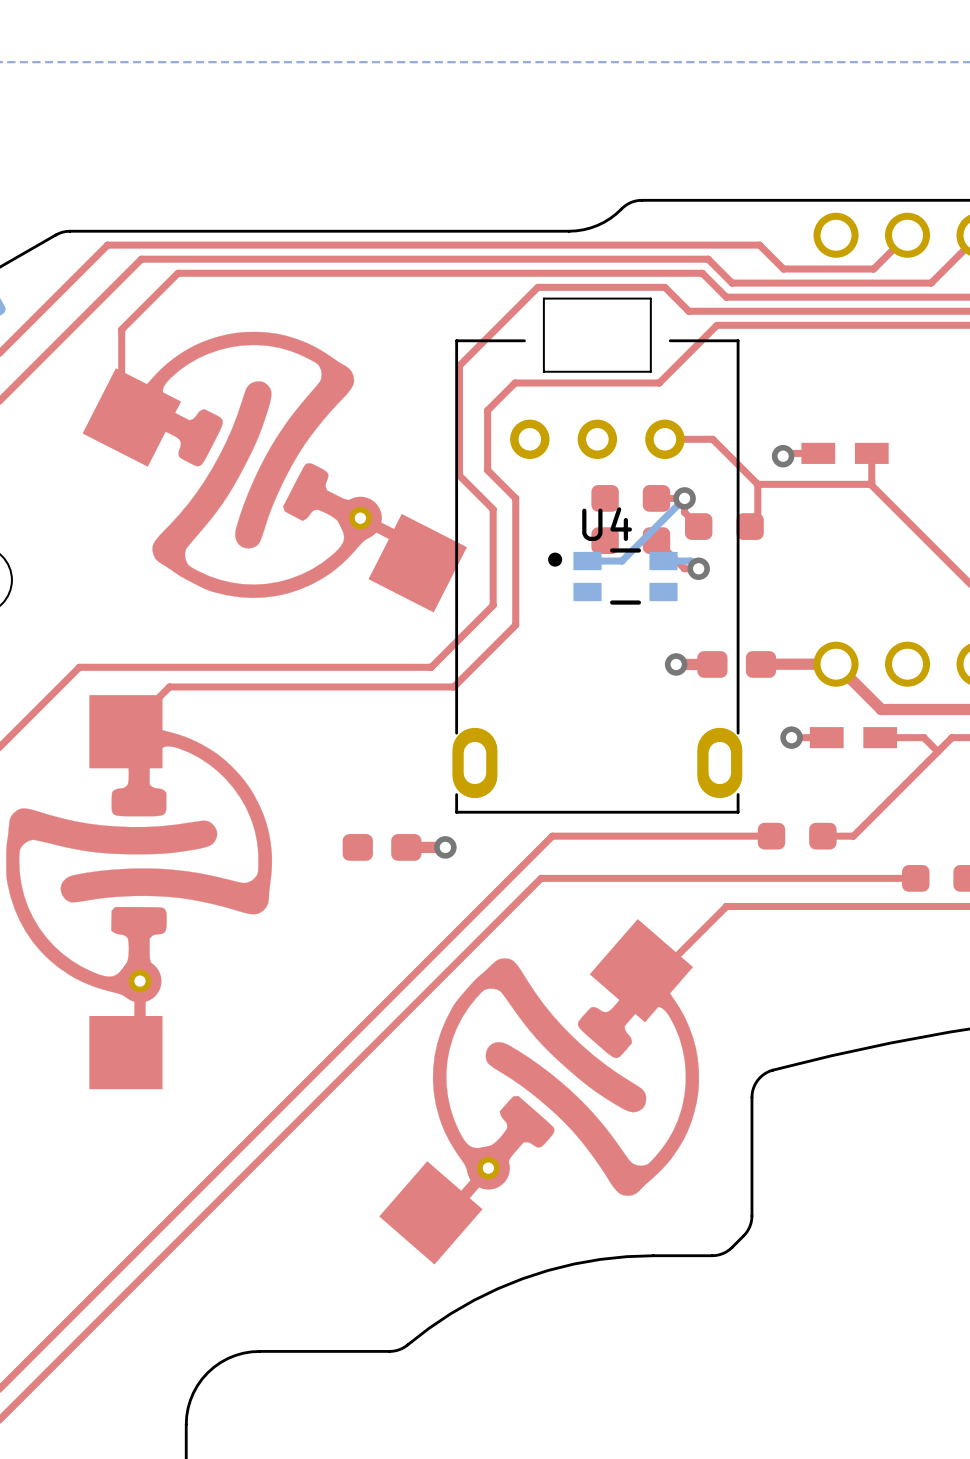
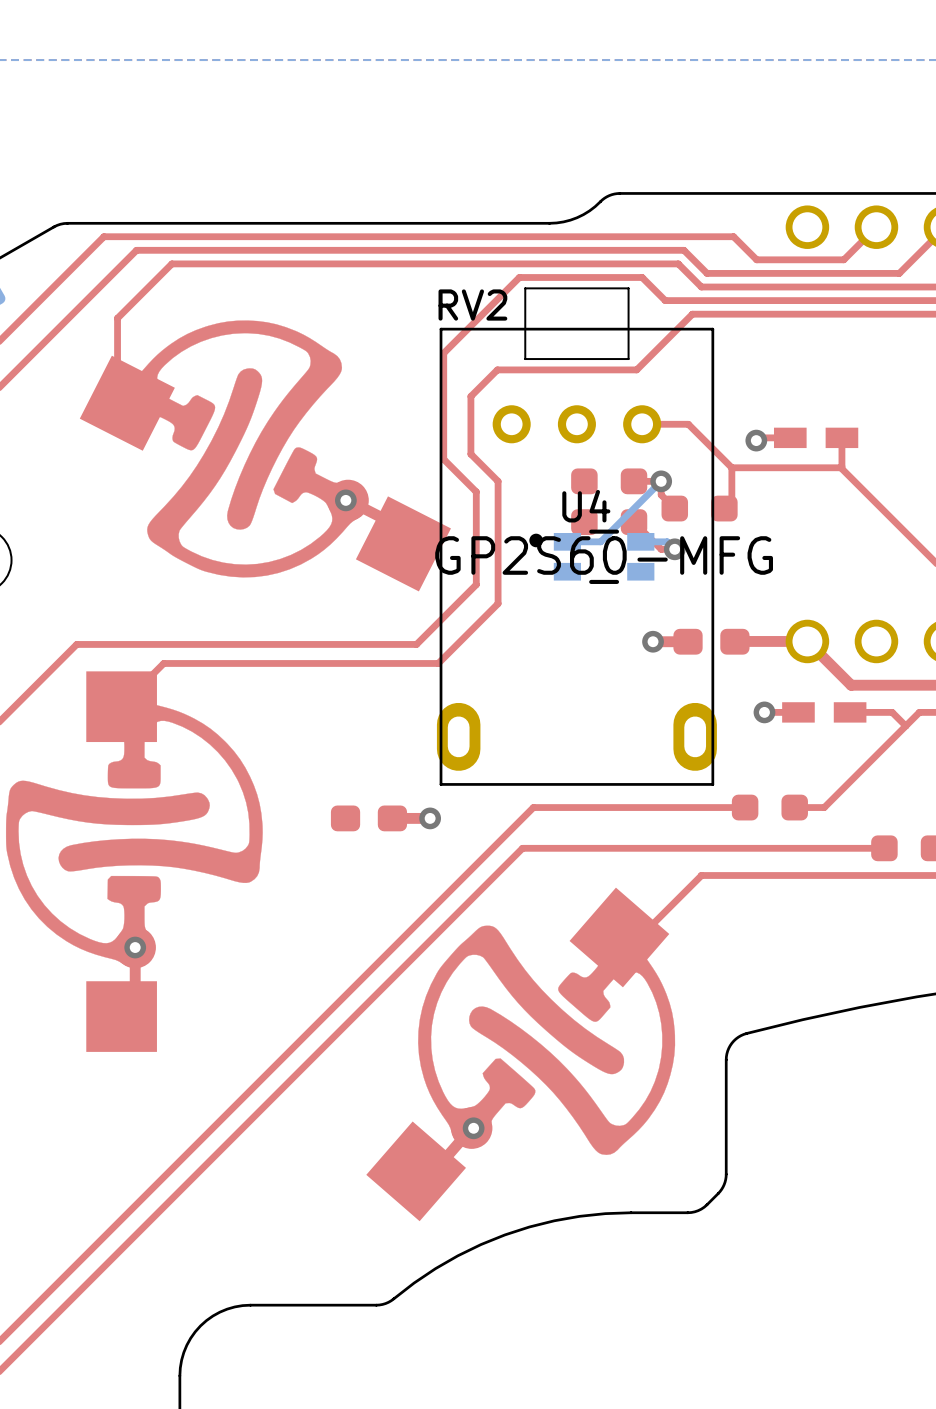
part footprint: [82, 331, 467, 613] -> [79, 320, 451, 592]
via: none -> (345, 500)
U4 value: none -> GP2S60-MFG (604, 555)
part: (597, 576) -> none
RV2: none -> (576, 556)
part footprint: [6, 695, 273, 1090] -> [5, 671, 263, 1052]
part footprint: [379, 919, 700, 1265] -> [366, 887, 676, 1222]
via: none -> (135, 947)
via: none -> (473, 1128)

